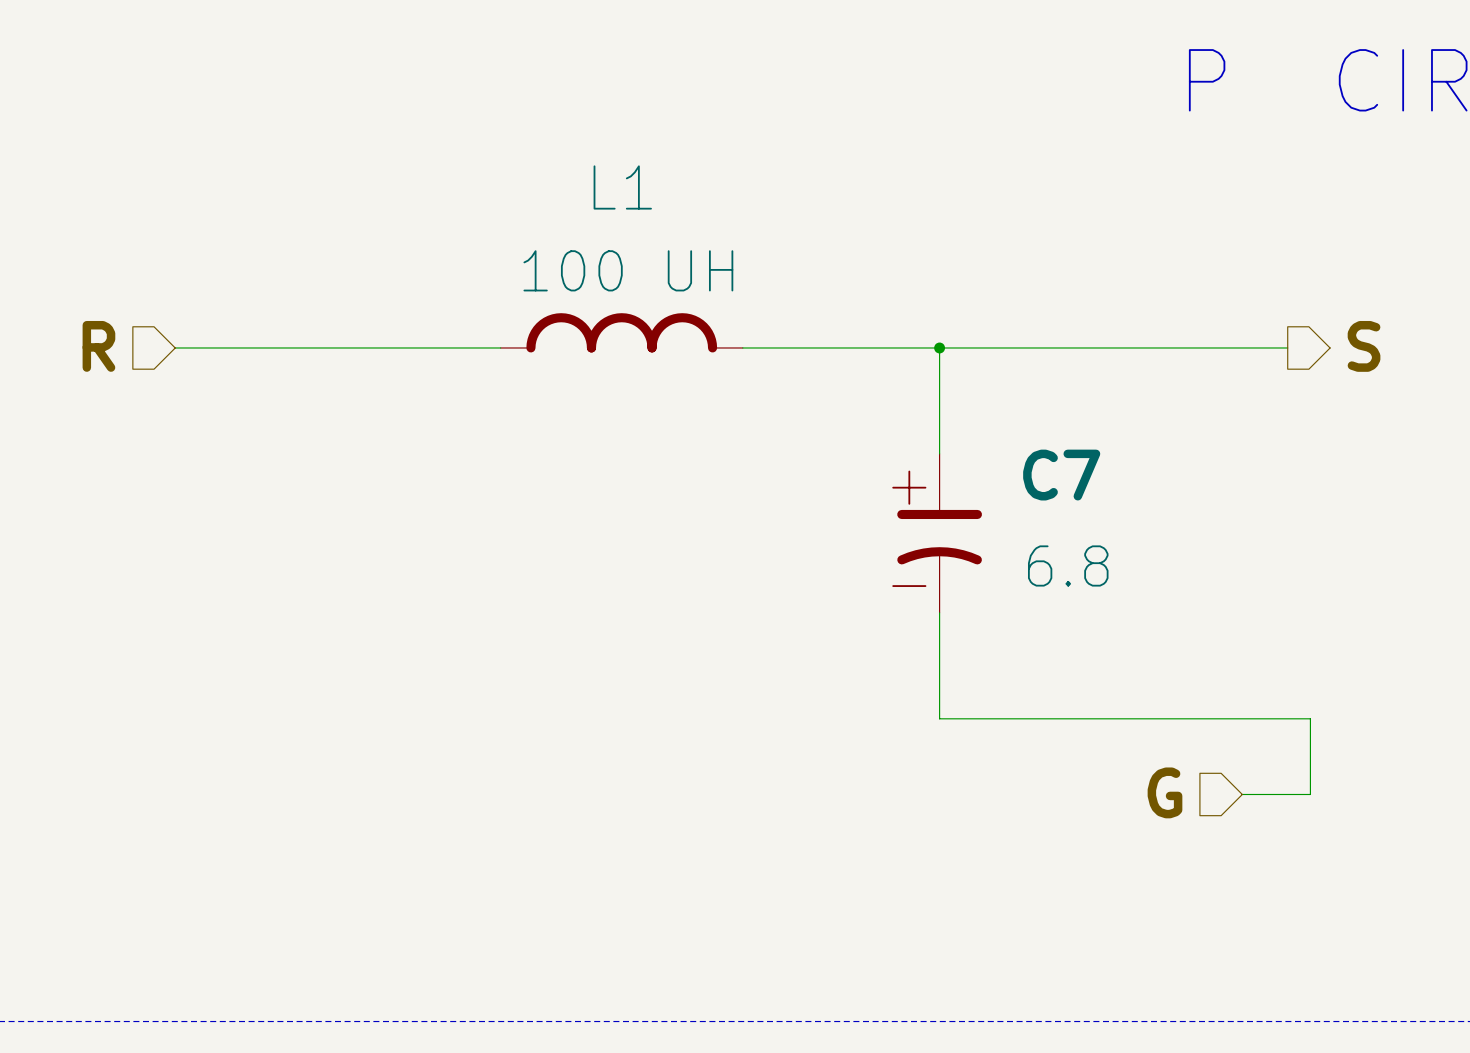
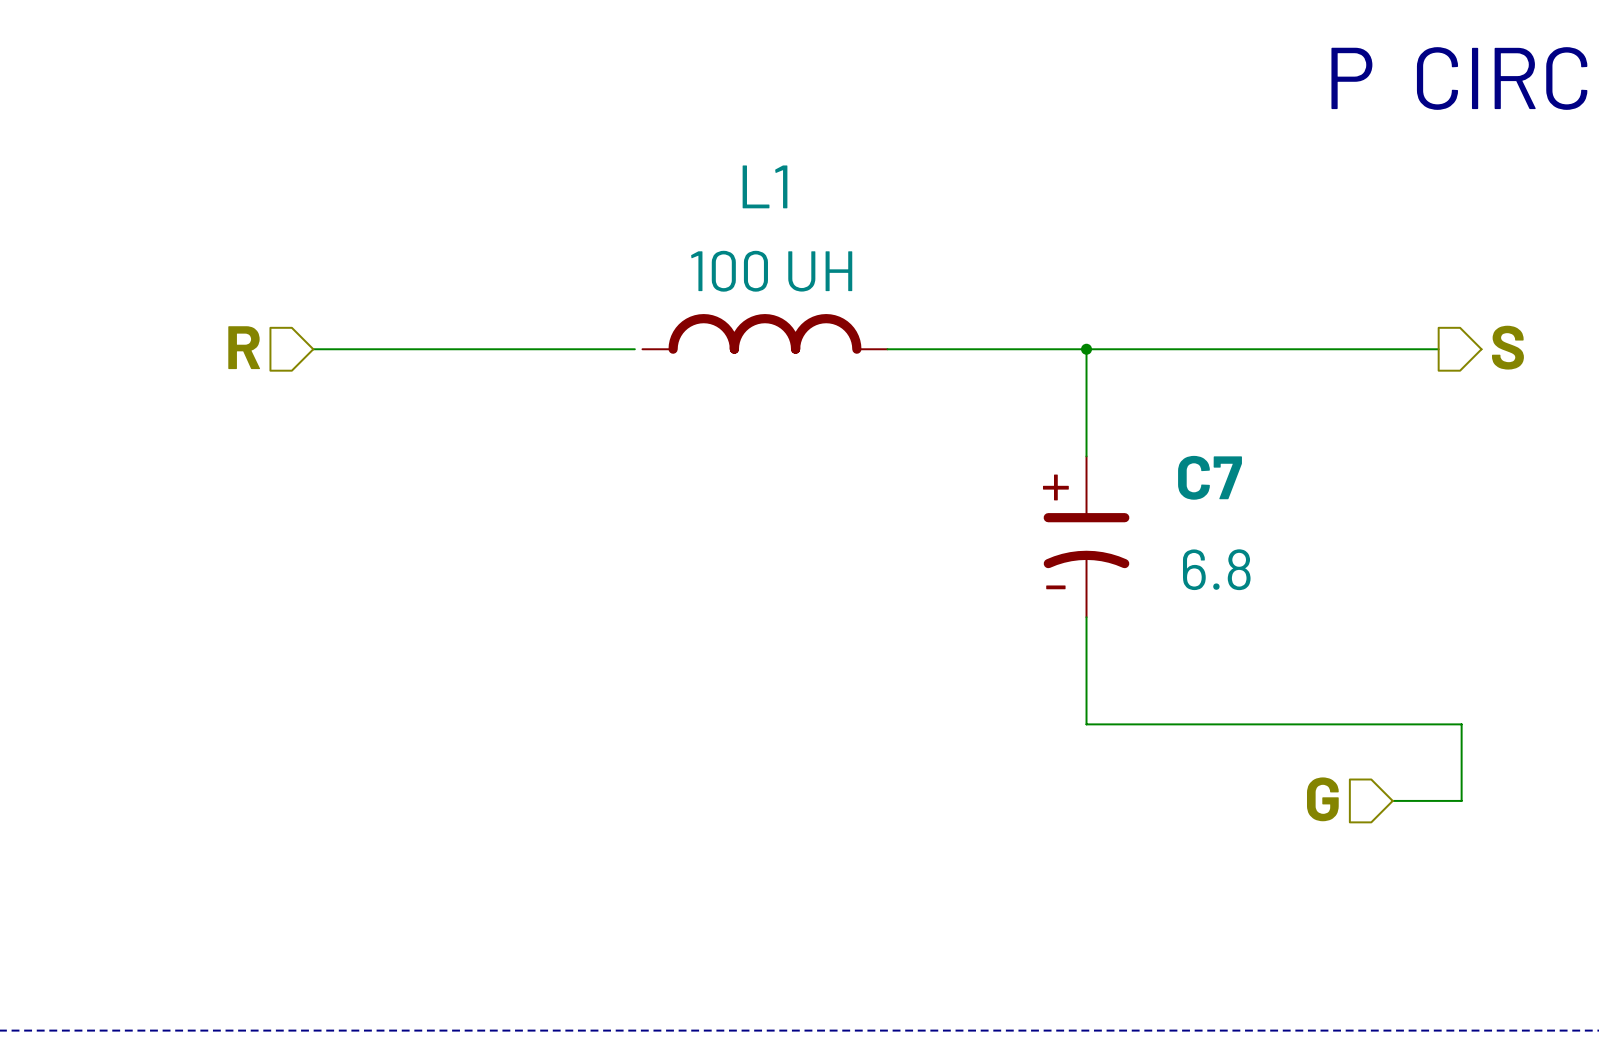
wire: (493, 347) (500, 347) -> none

